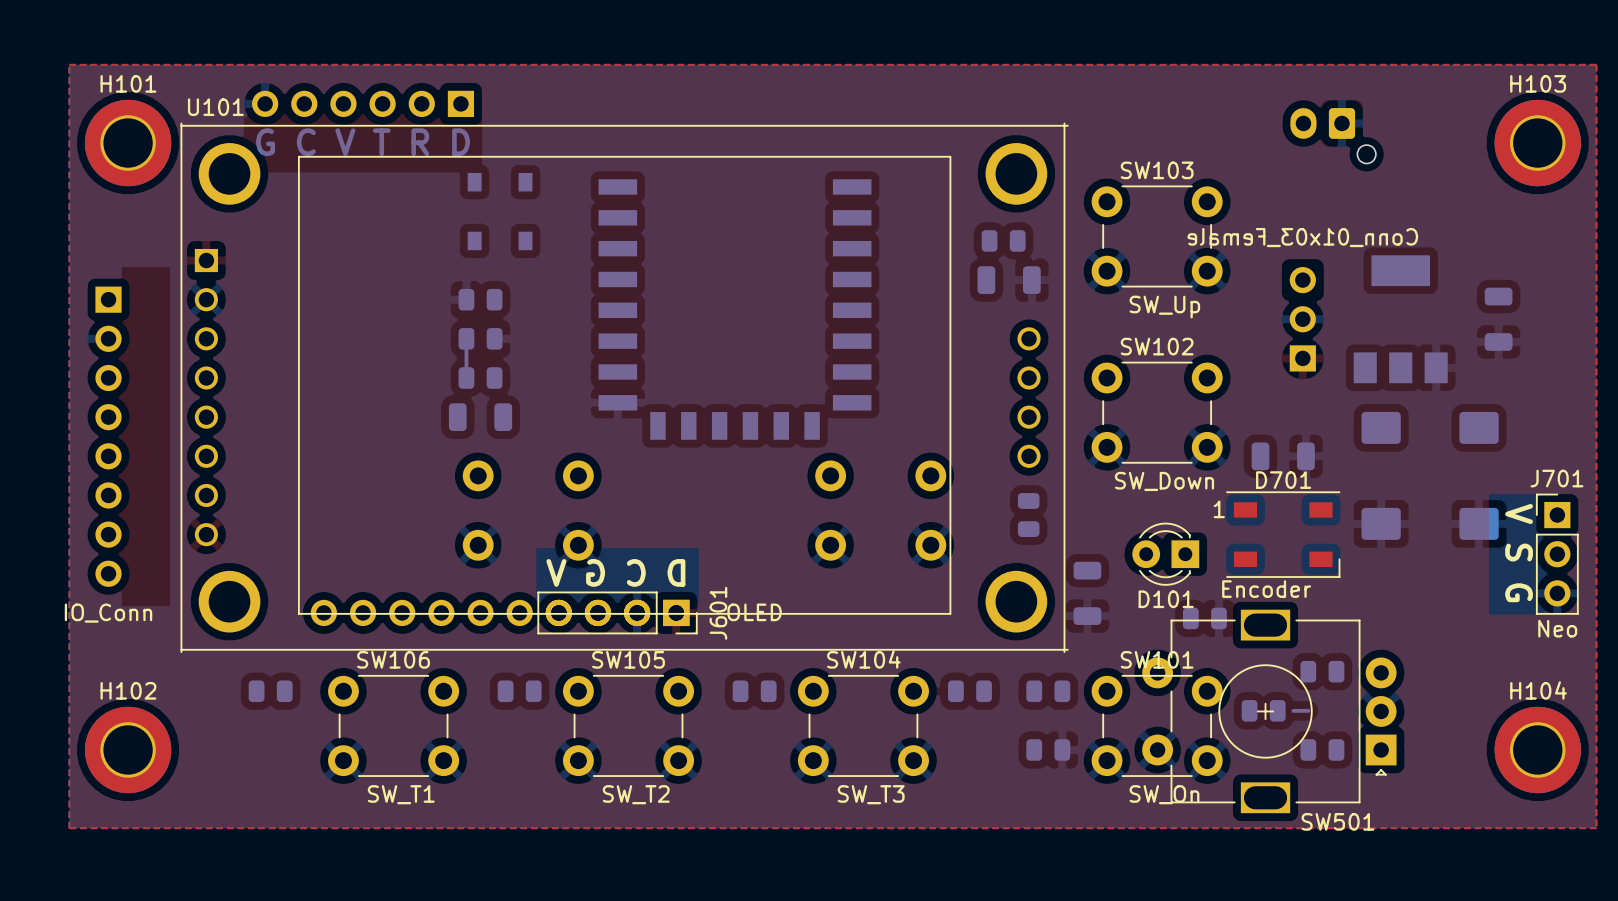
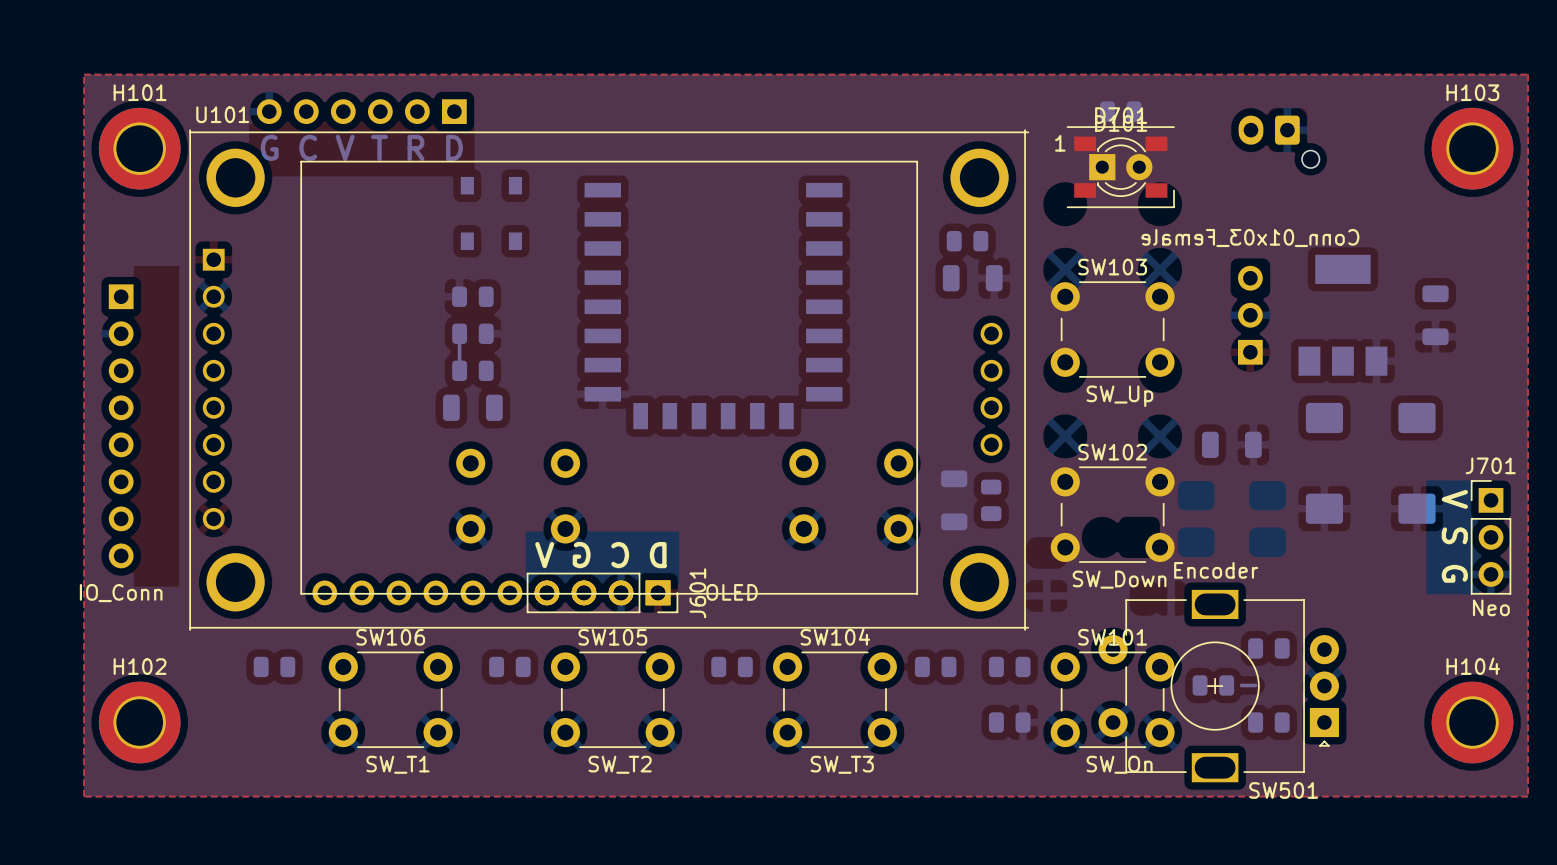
part: none -> (1120, 111)
SW103 position: (1157, 236) -> (1112, 329)
SW102 position: (1157, 412) -> (1112, 514)
D701 position: (1283, 534) -> (1120, 167)
D101 rotation: 0° (1165, 554) -> 180° (1120, 167)
D101 position: (1165, 554) -> (1120, 167)
part position: (1087, 593) -> (954, 500)
part: (1204, 618) -> none

